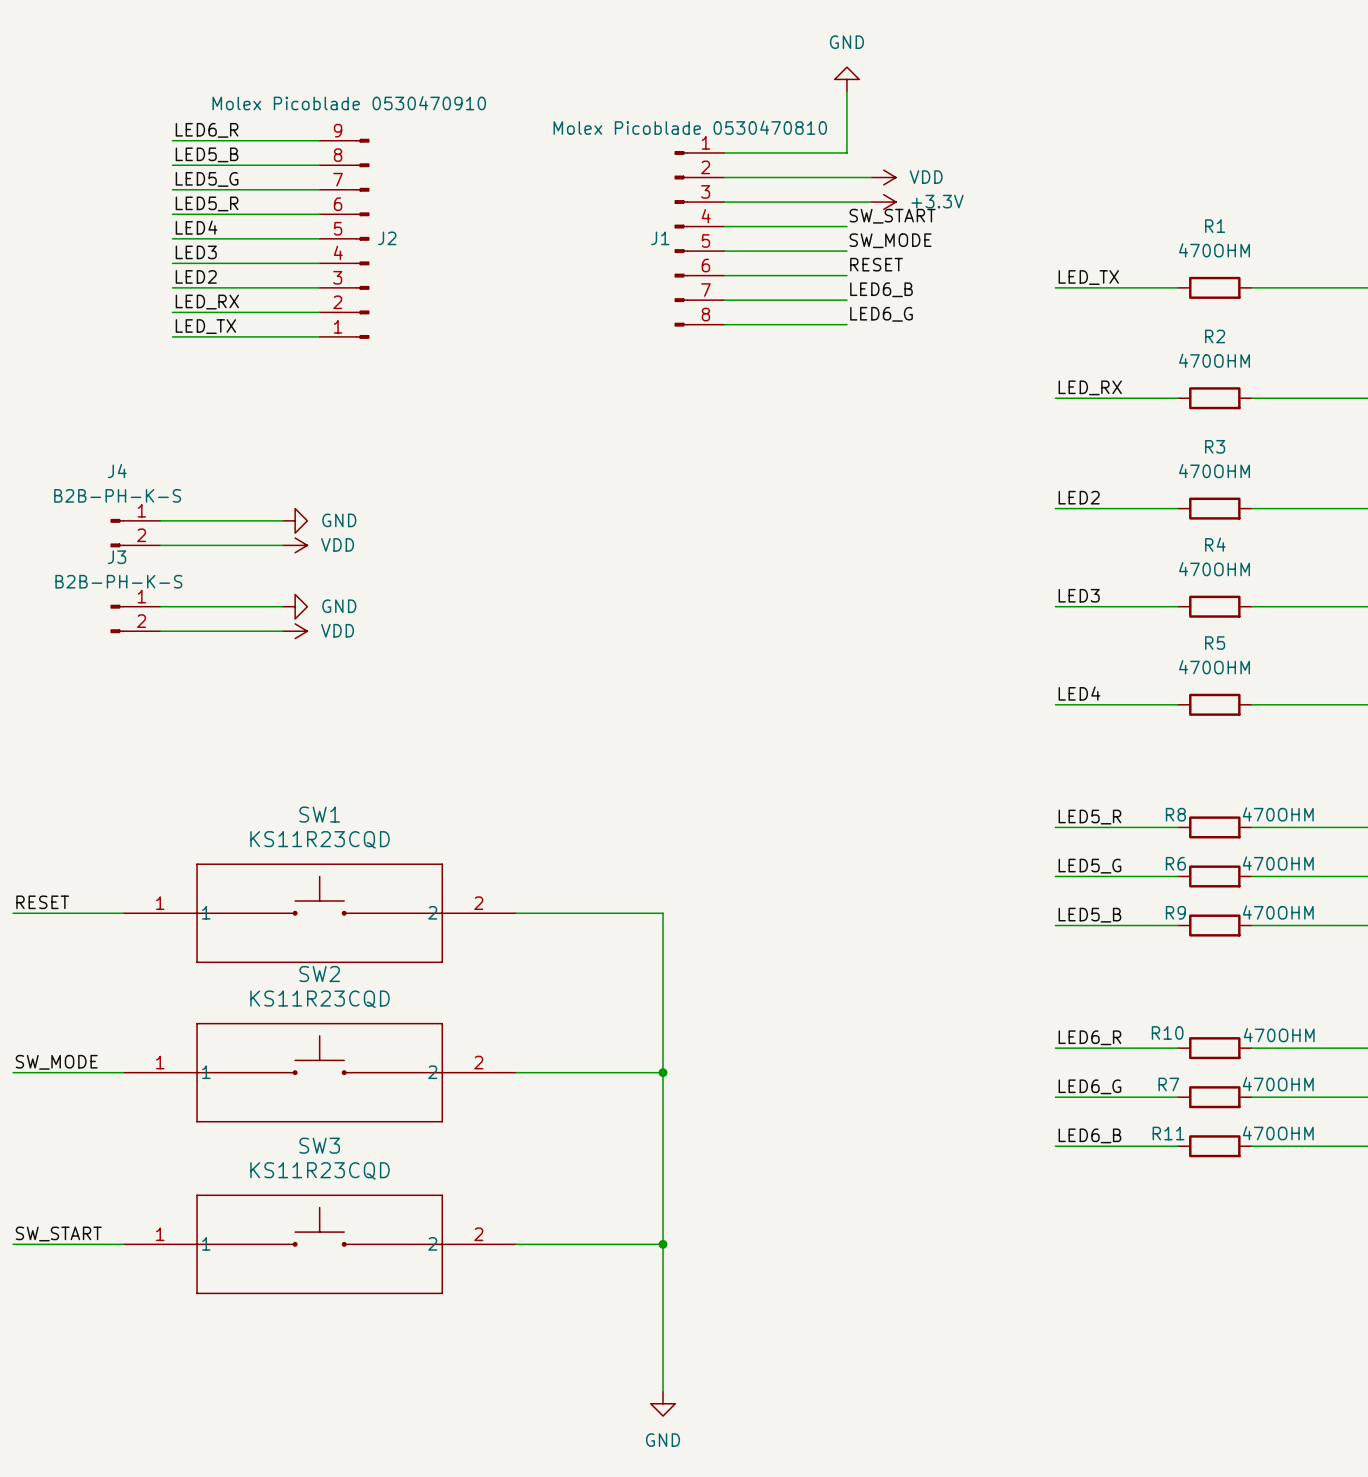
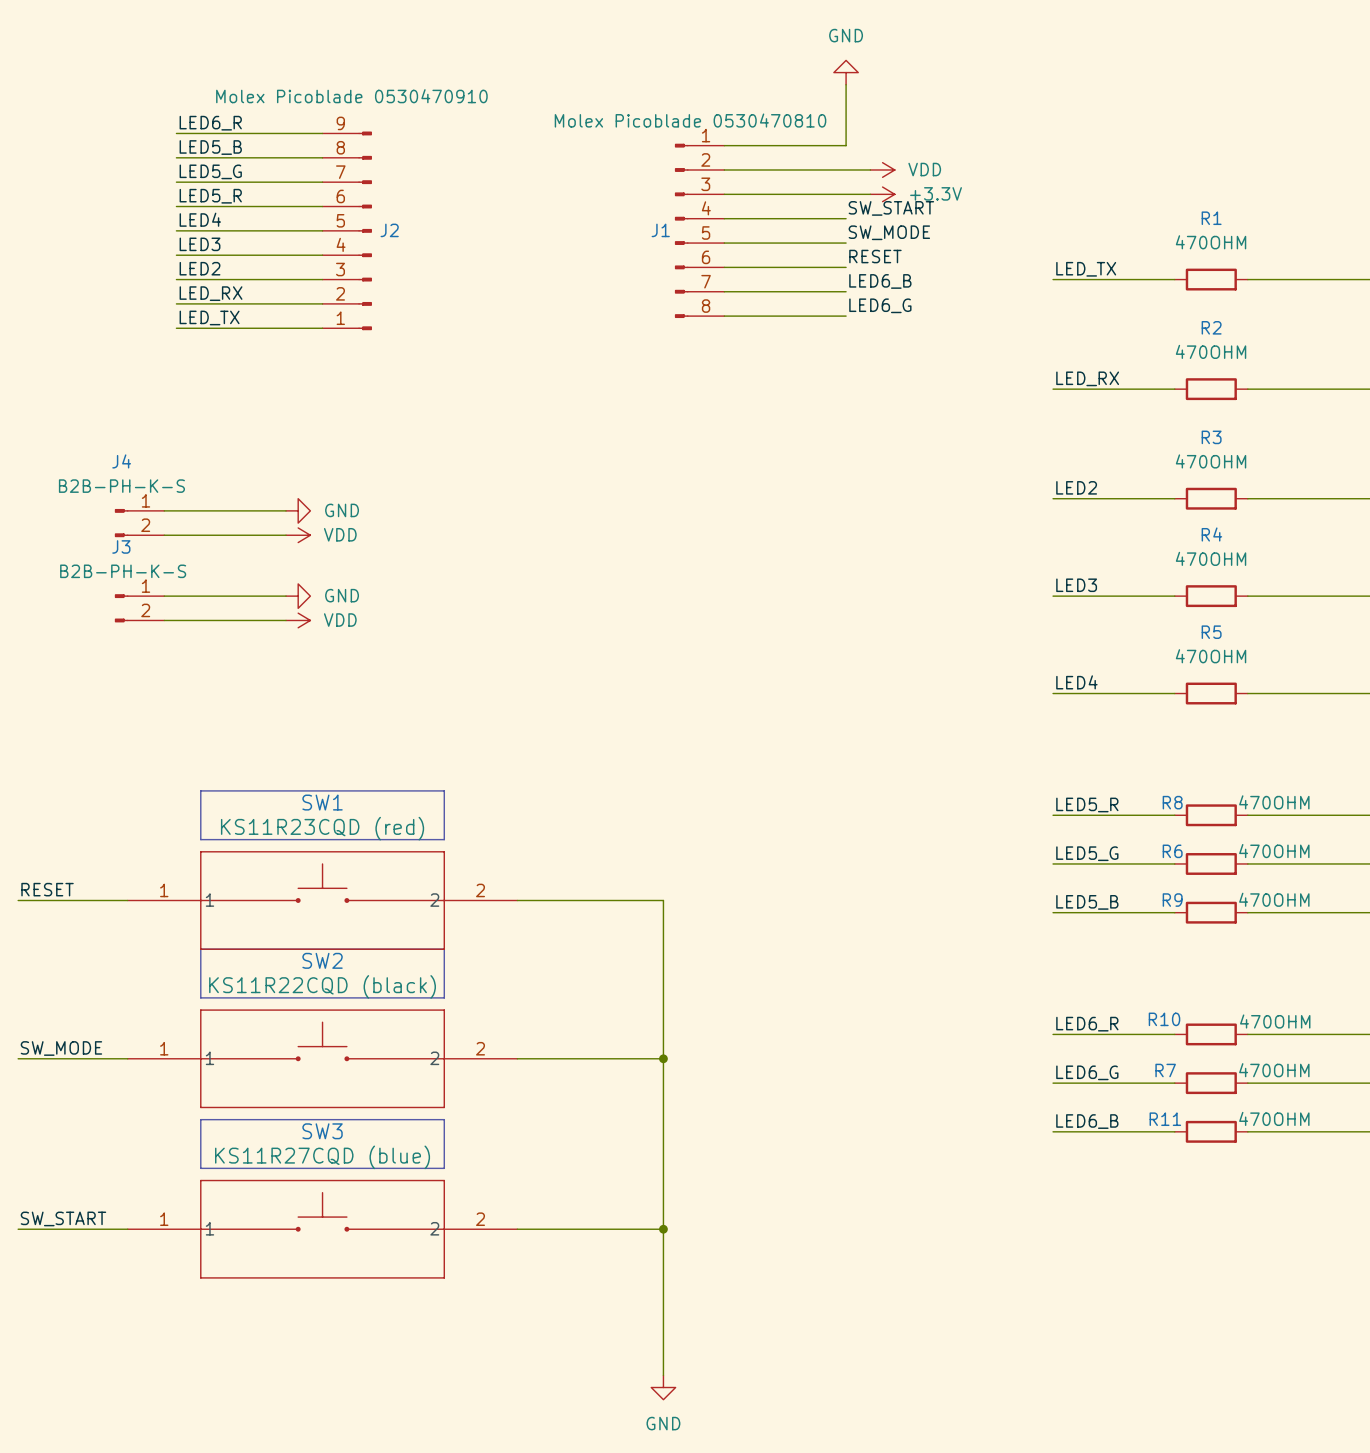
line: none -> (200, 790) (200, 839) (444, 839) (444, 790) (200, 790)
SW1 value: KS11R23CQD (320, 839) -> KS11R23CQD (red) (322, 828)
line: none -> (200, 949) (444, 949) (444, 997) (200, 997) (200, 949)
SW2 value: KS11R23CQD (320, 999) -> KS11R22CQD (black) (322, 986)
line: none -> (200, 1119) (200, 1168) (444, 1168) (444, 1119) (200, 1119)
SW3 value: KS11R23CQD (320, 1170) -> KS11R27CQD (blue) (322, 1157)

